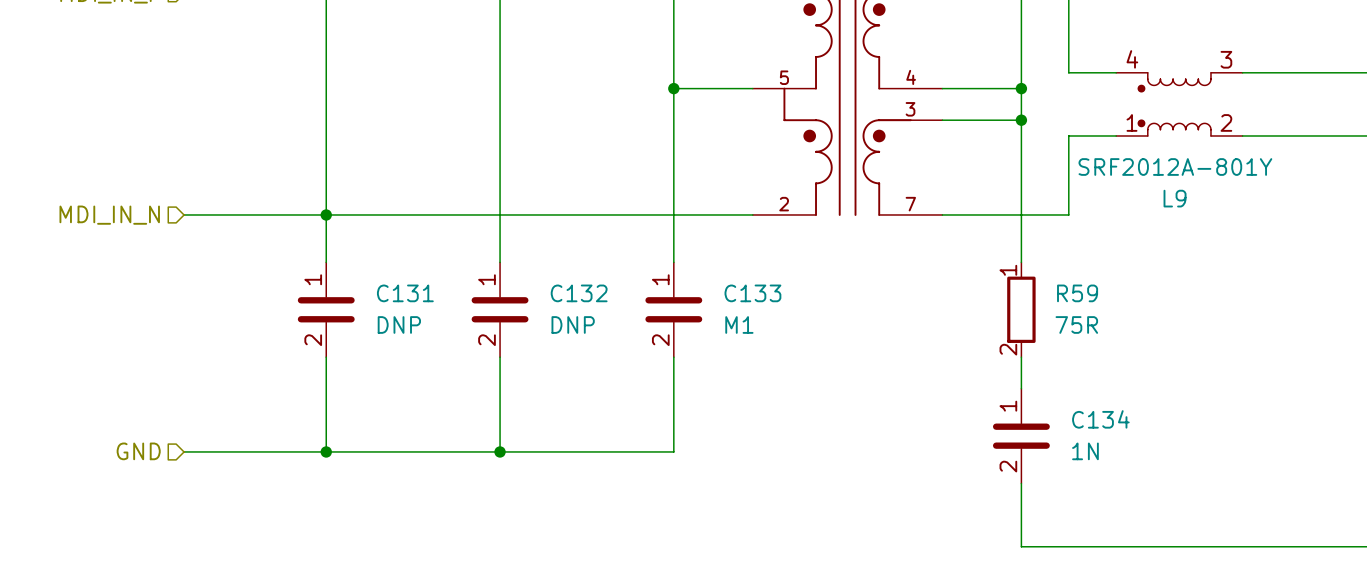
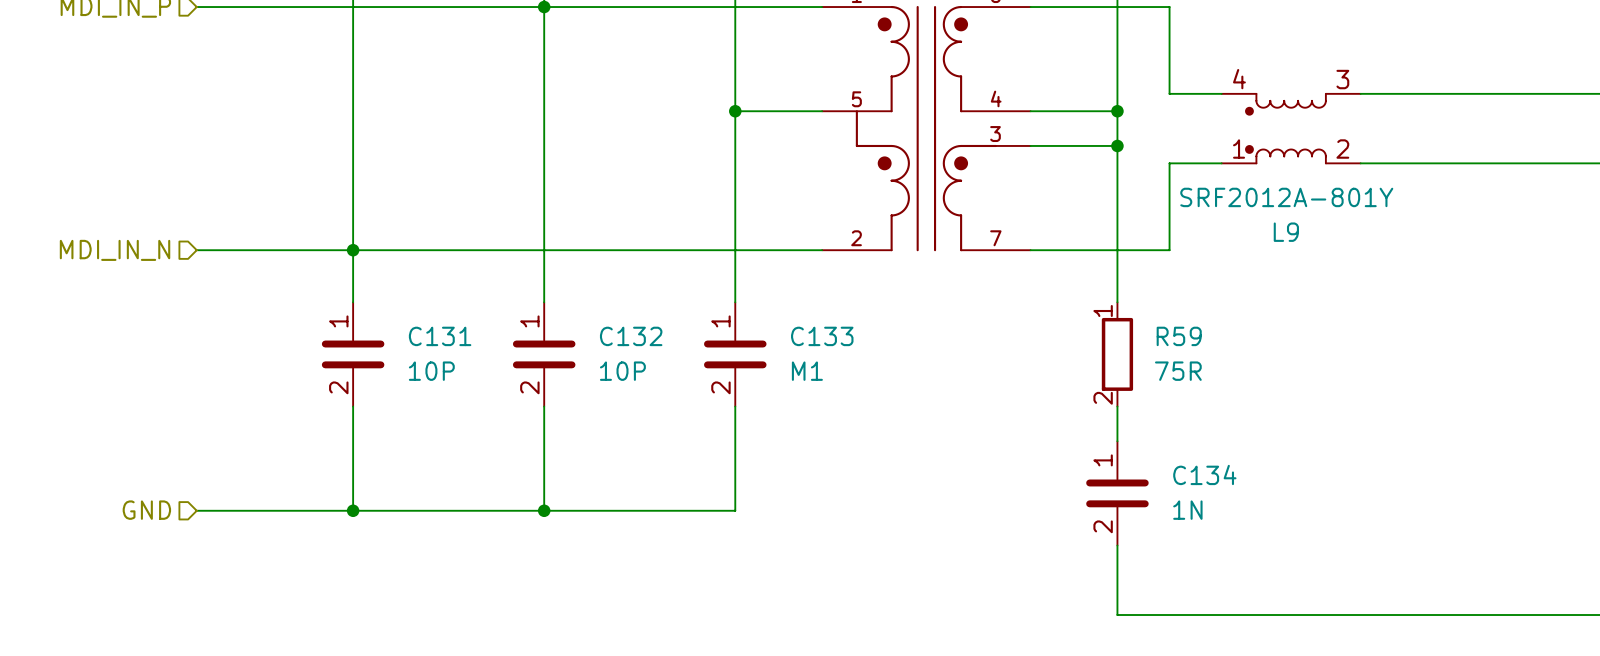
C131 value: DNP (399, 324) -> 10P (431, 371)
C132 value: DNP (573, 324) -> 10P (622, 371)

